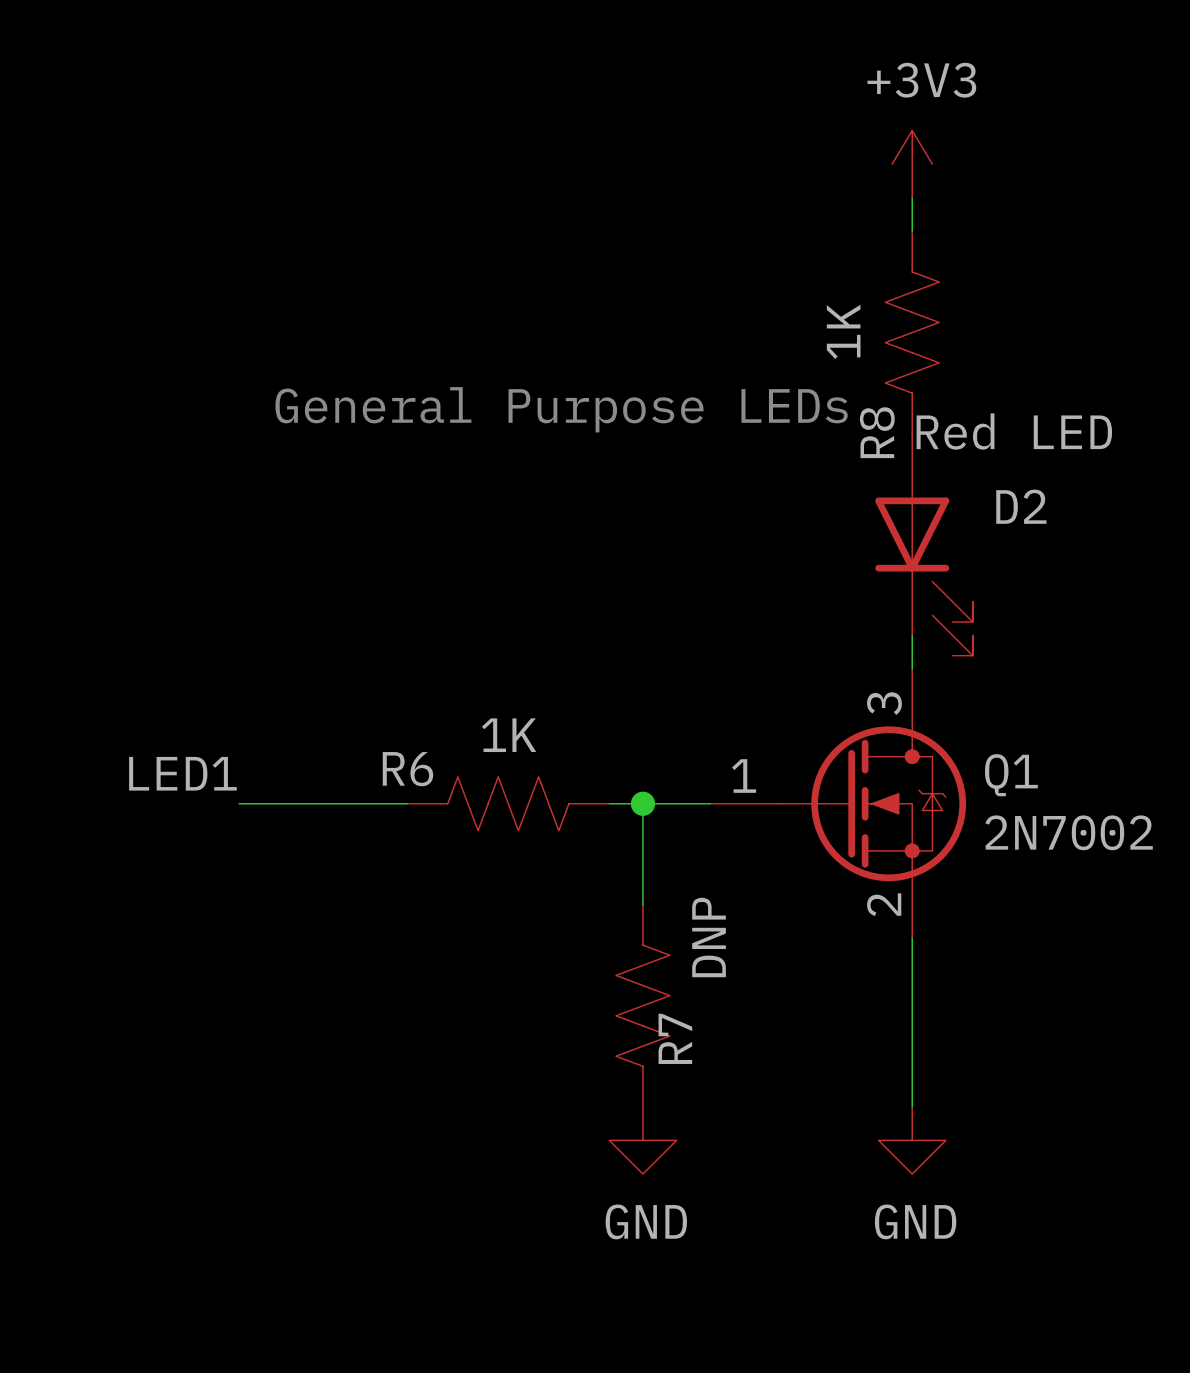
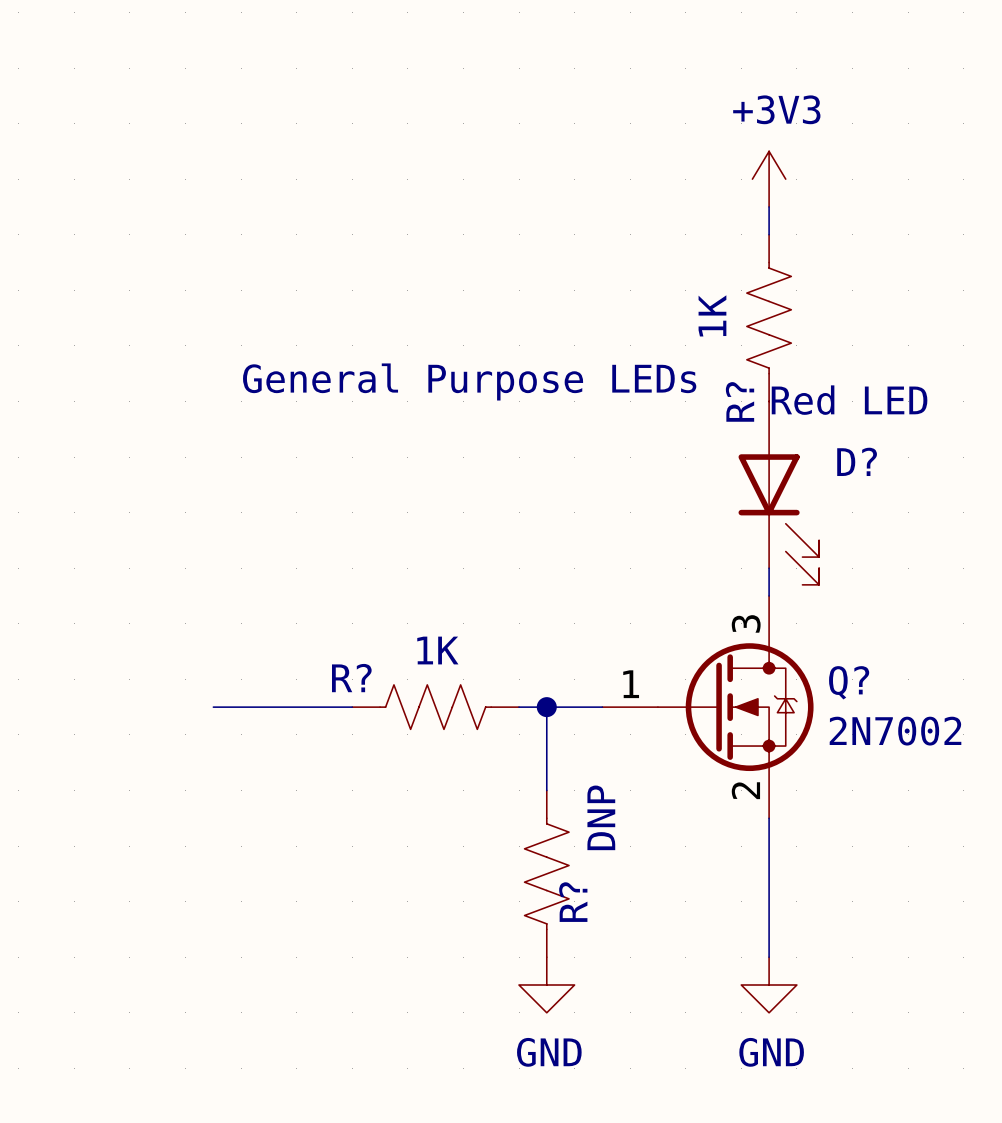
R8 name: R8 (877, 432) -> R? (740, 401)
D2 name: D2 (1021, 506) -> D? (857, 461)
R6 name: R6 (407, 769) -> R? (351, 678)
label: LED1 (182, 773) -> none
Q1 name: Q1 (1011, 775) -> Q? (849, 682)
R7 name: R7 (675, 1038) -> R? (573, 902)

